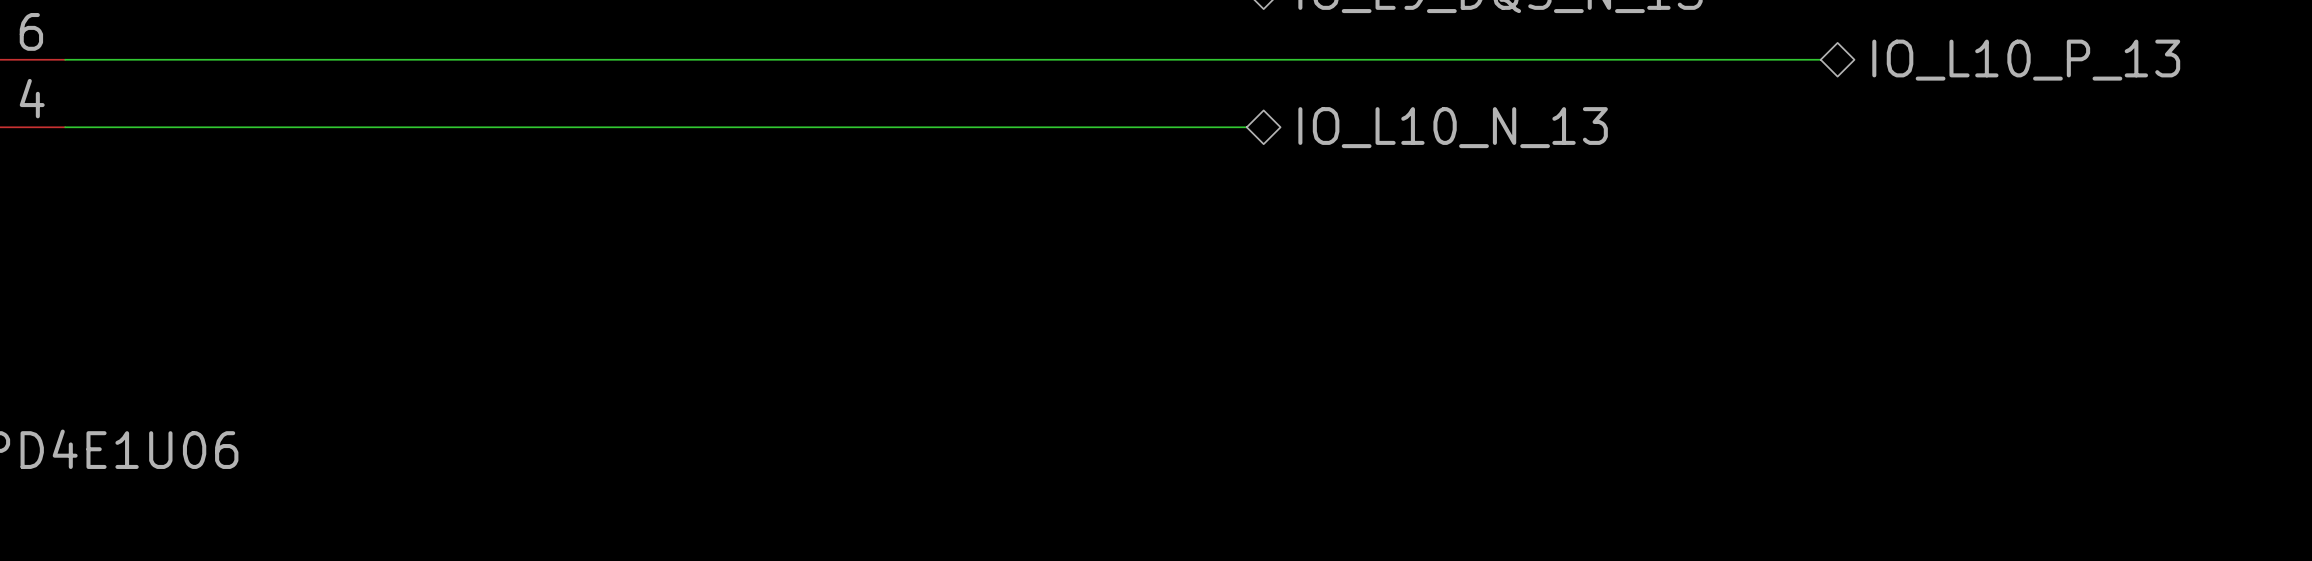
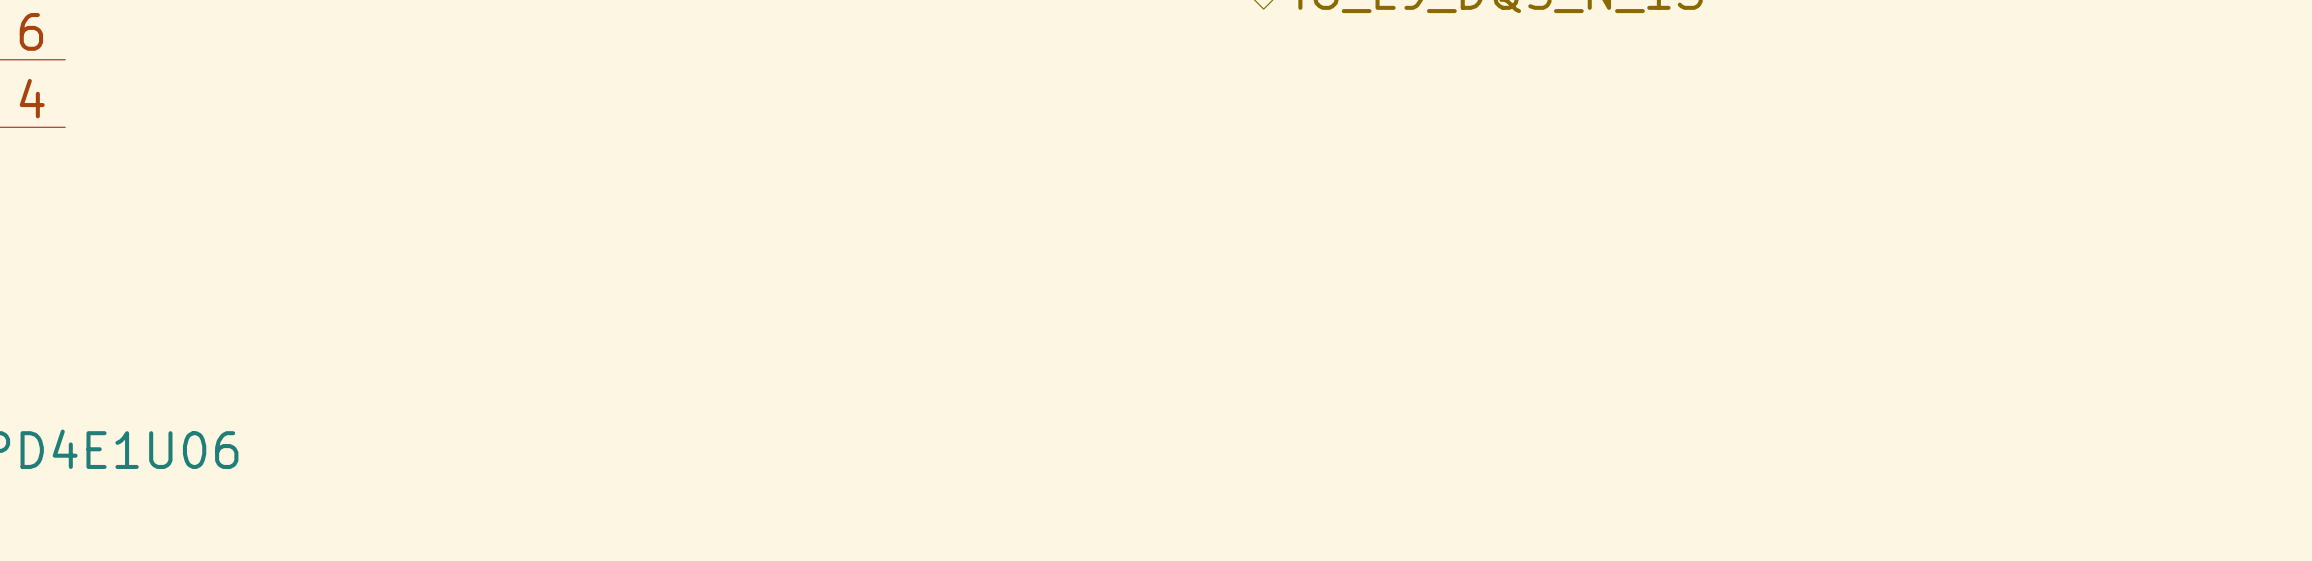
wire: (65, 59) (1820, 59) -> none
hierarchical label: IO_L10_P_13 (2026, 60) -> none
wire: (65, 127) (1246, 127) -> none
hierarchical label: IO_L10_N_13 (1453, 127) -> none

